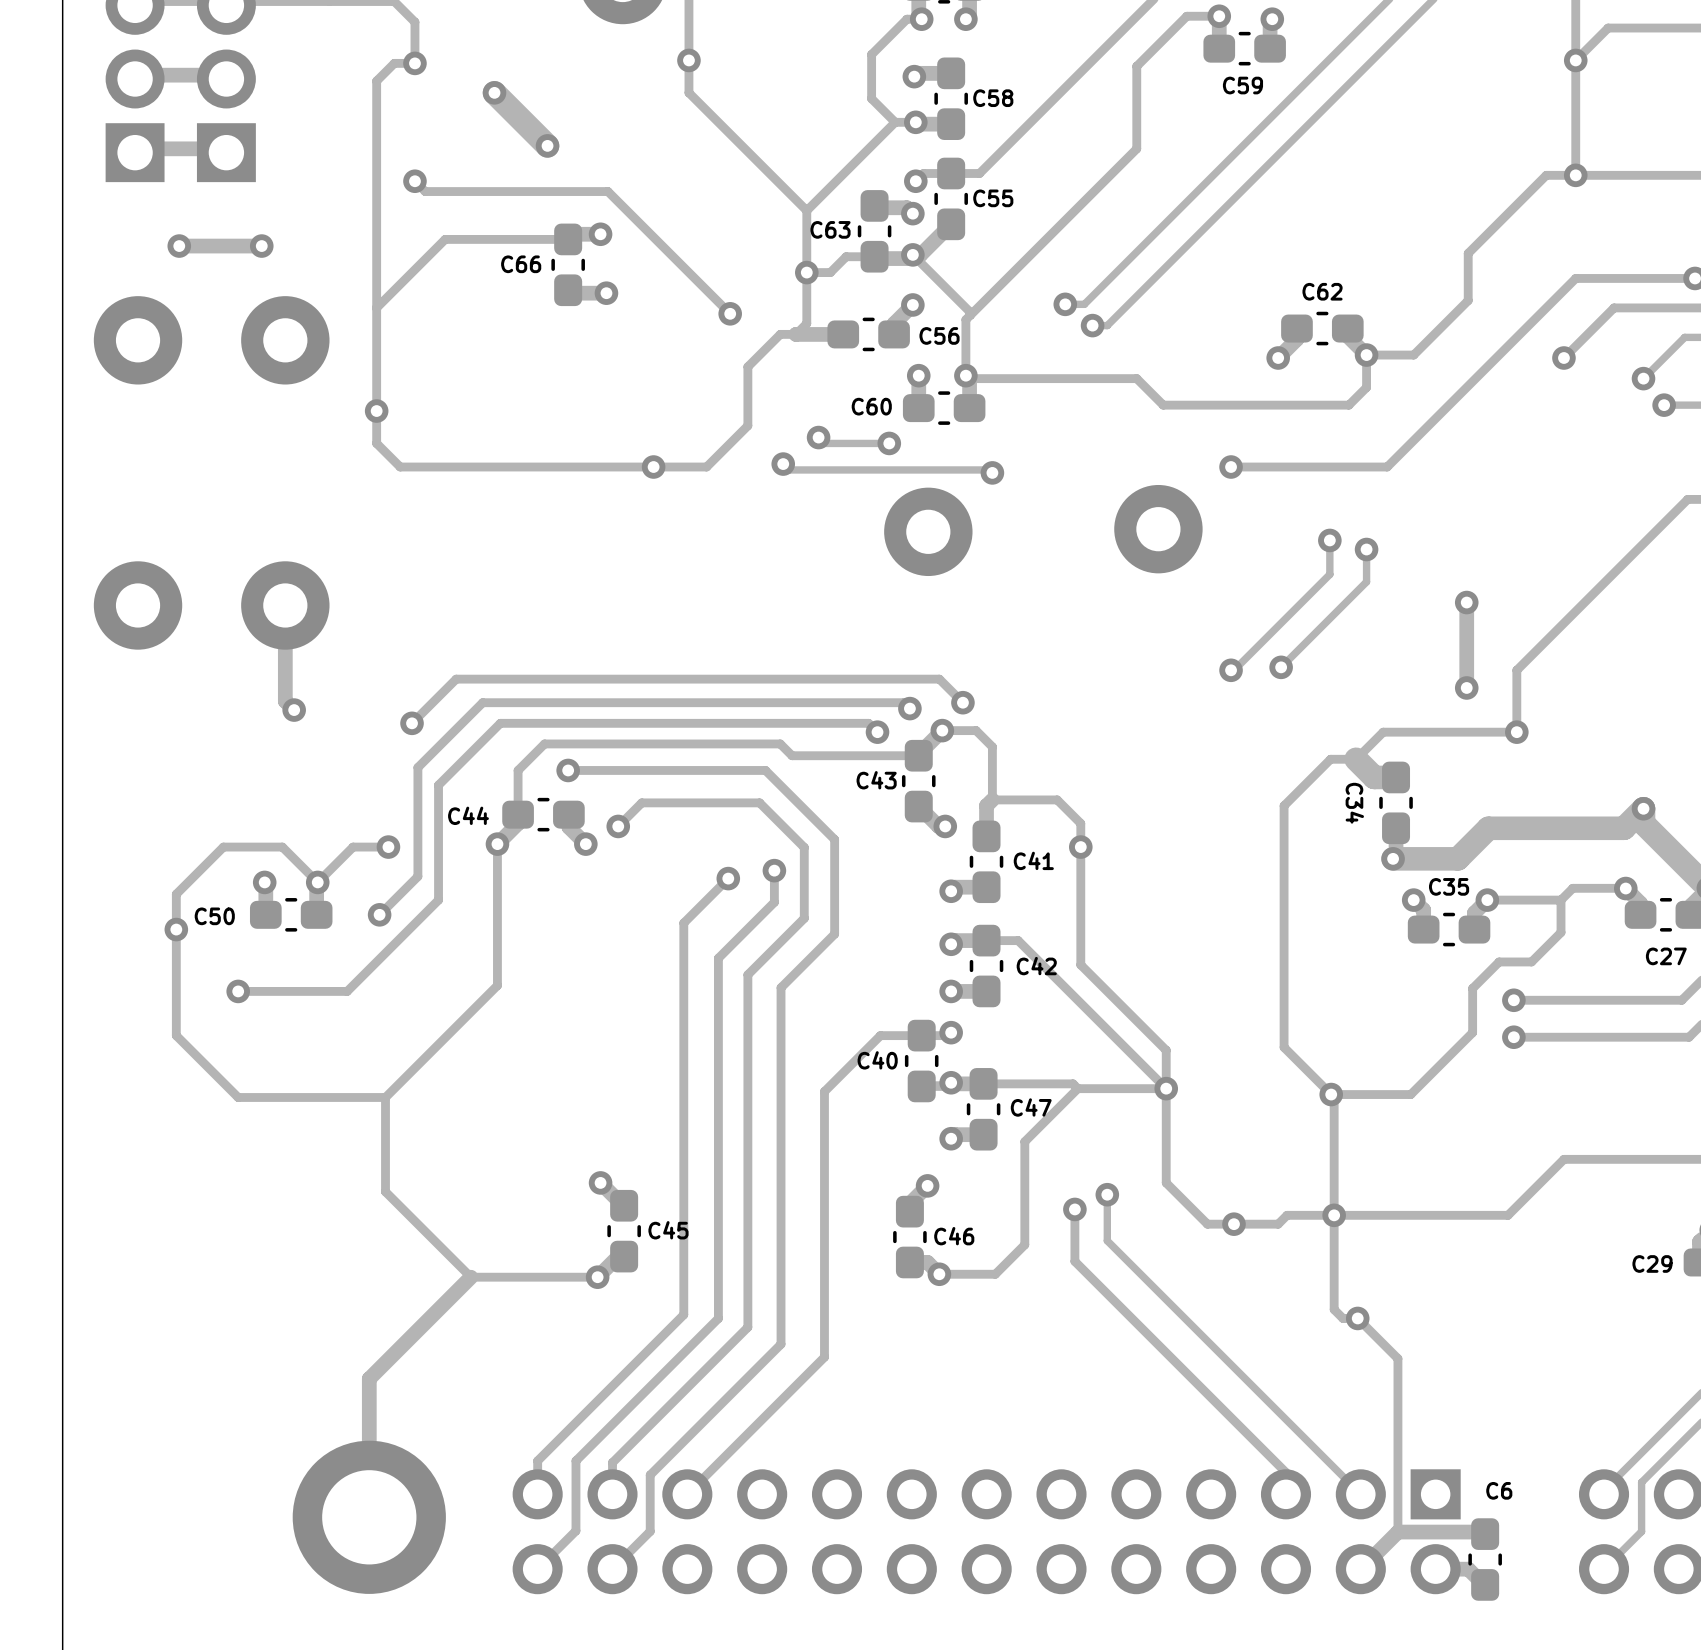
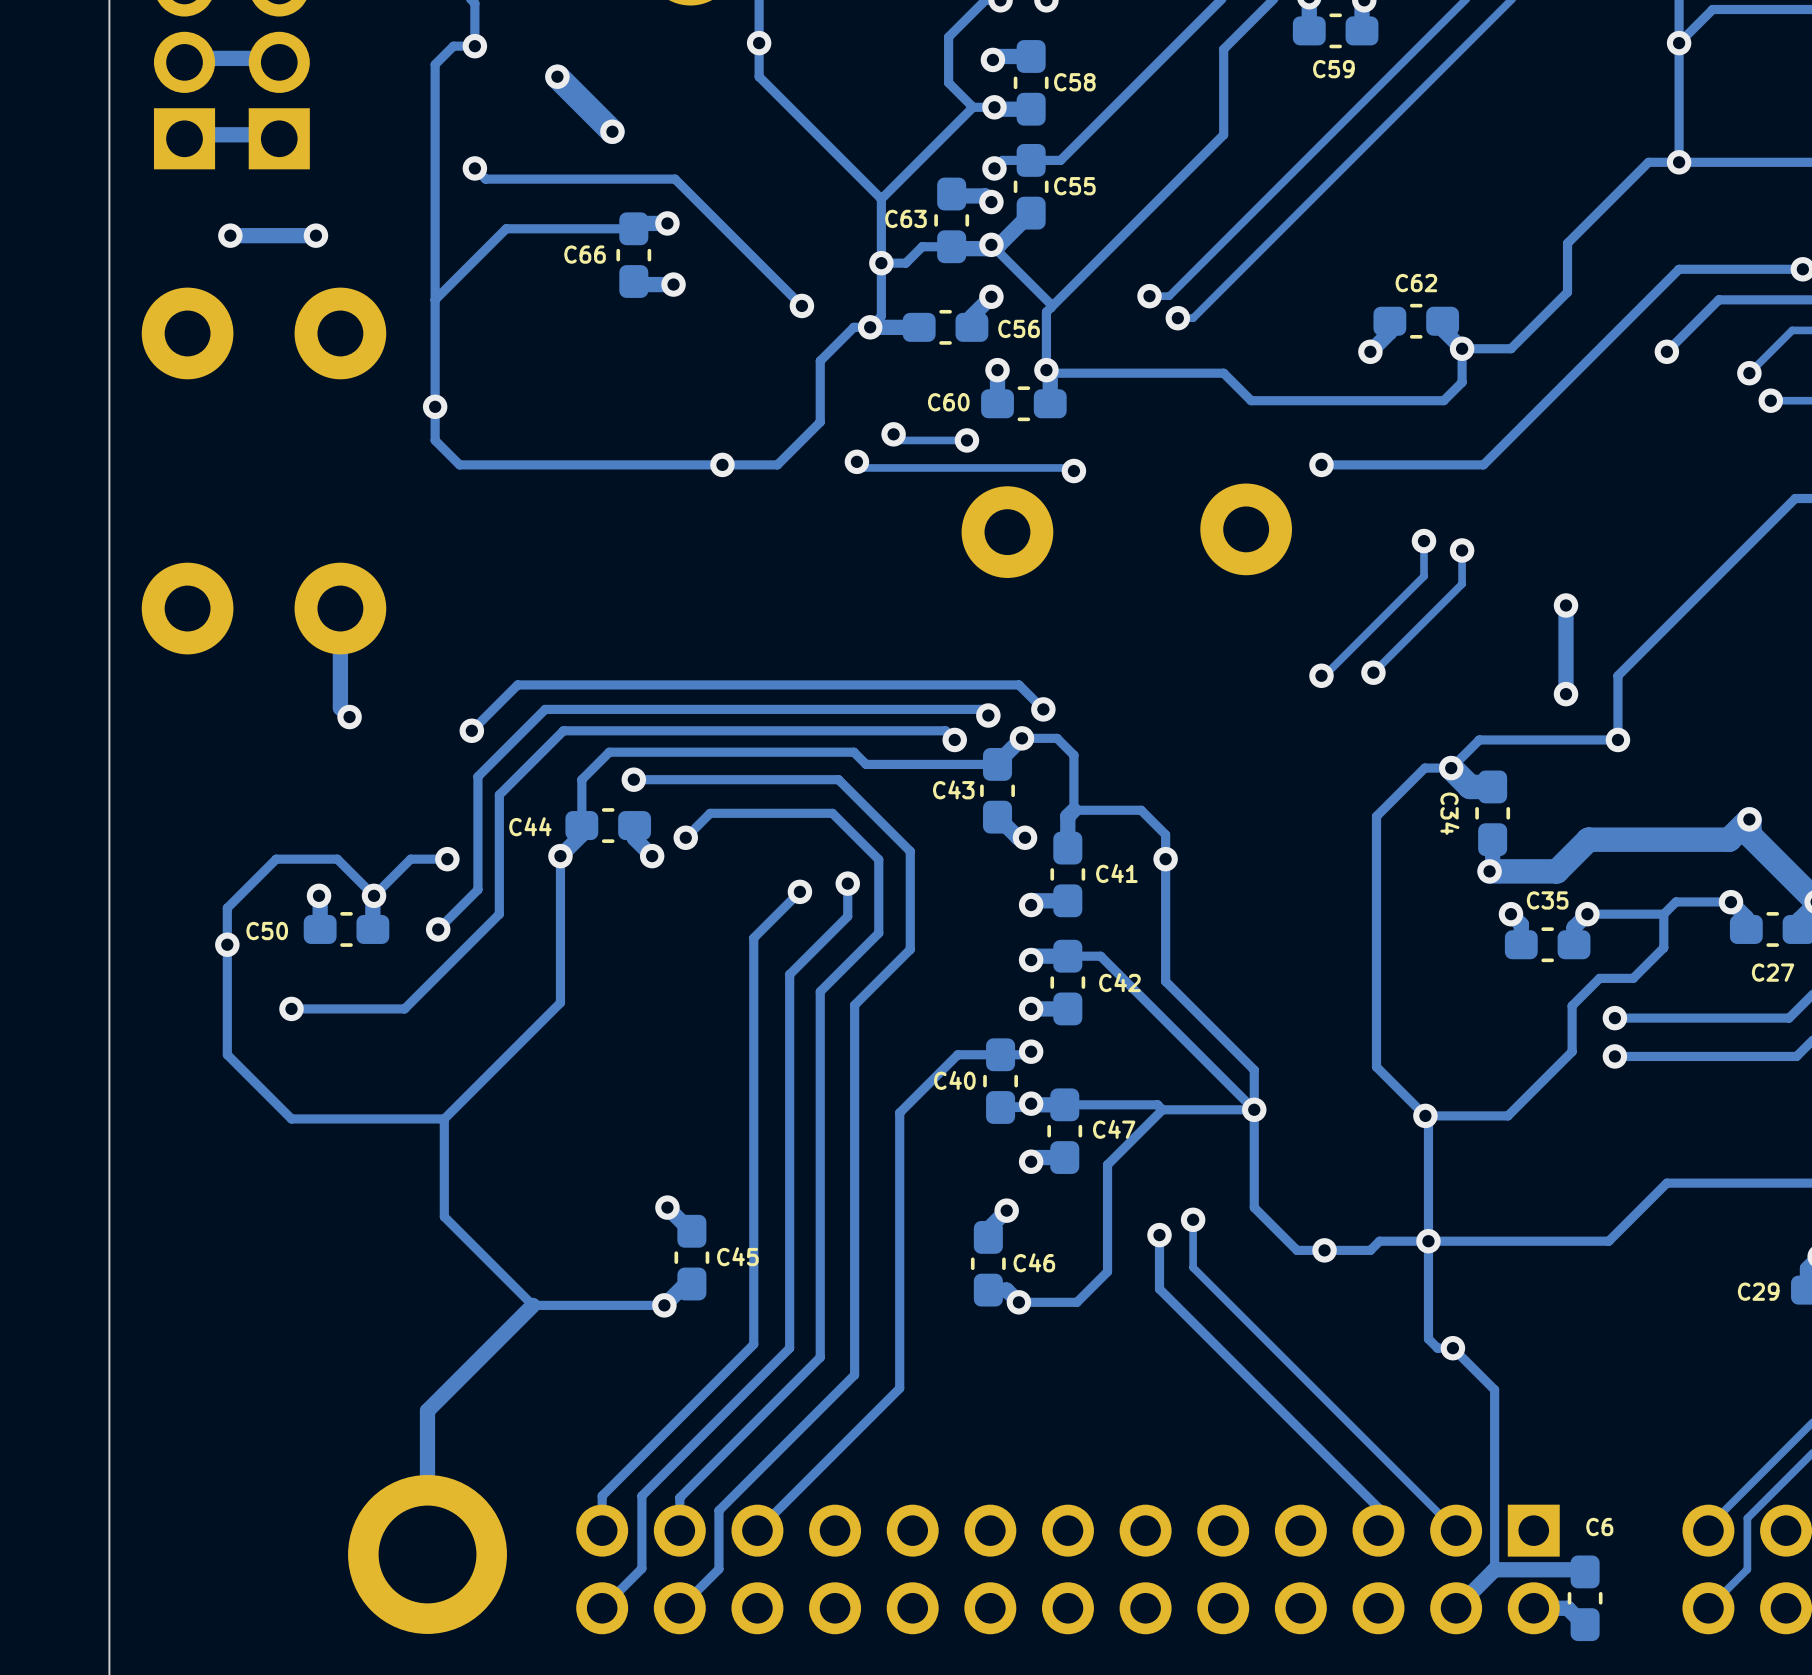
via: none -> (870, 327)
via: none -> (1451, 768)

